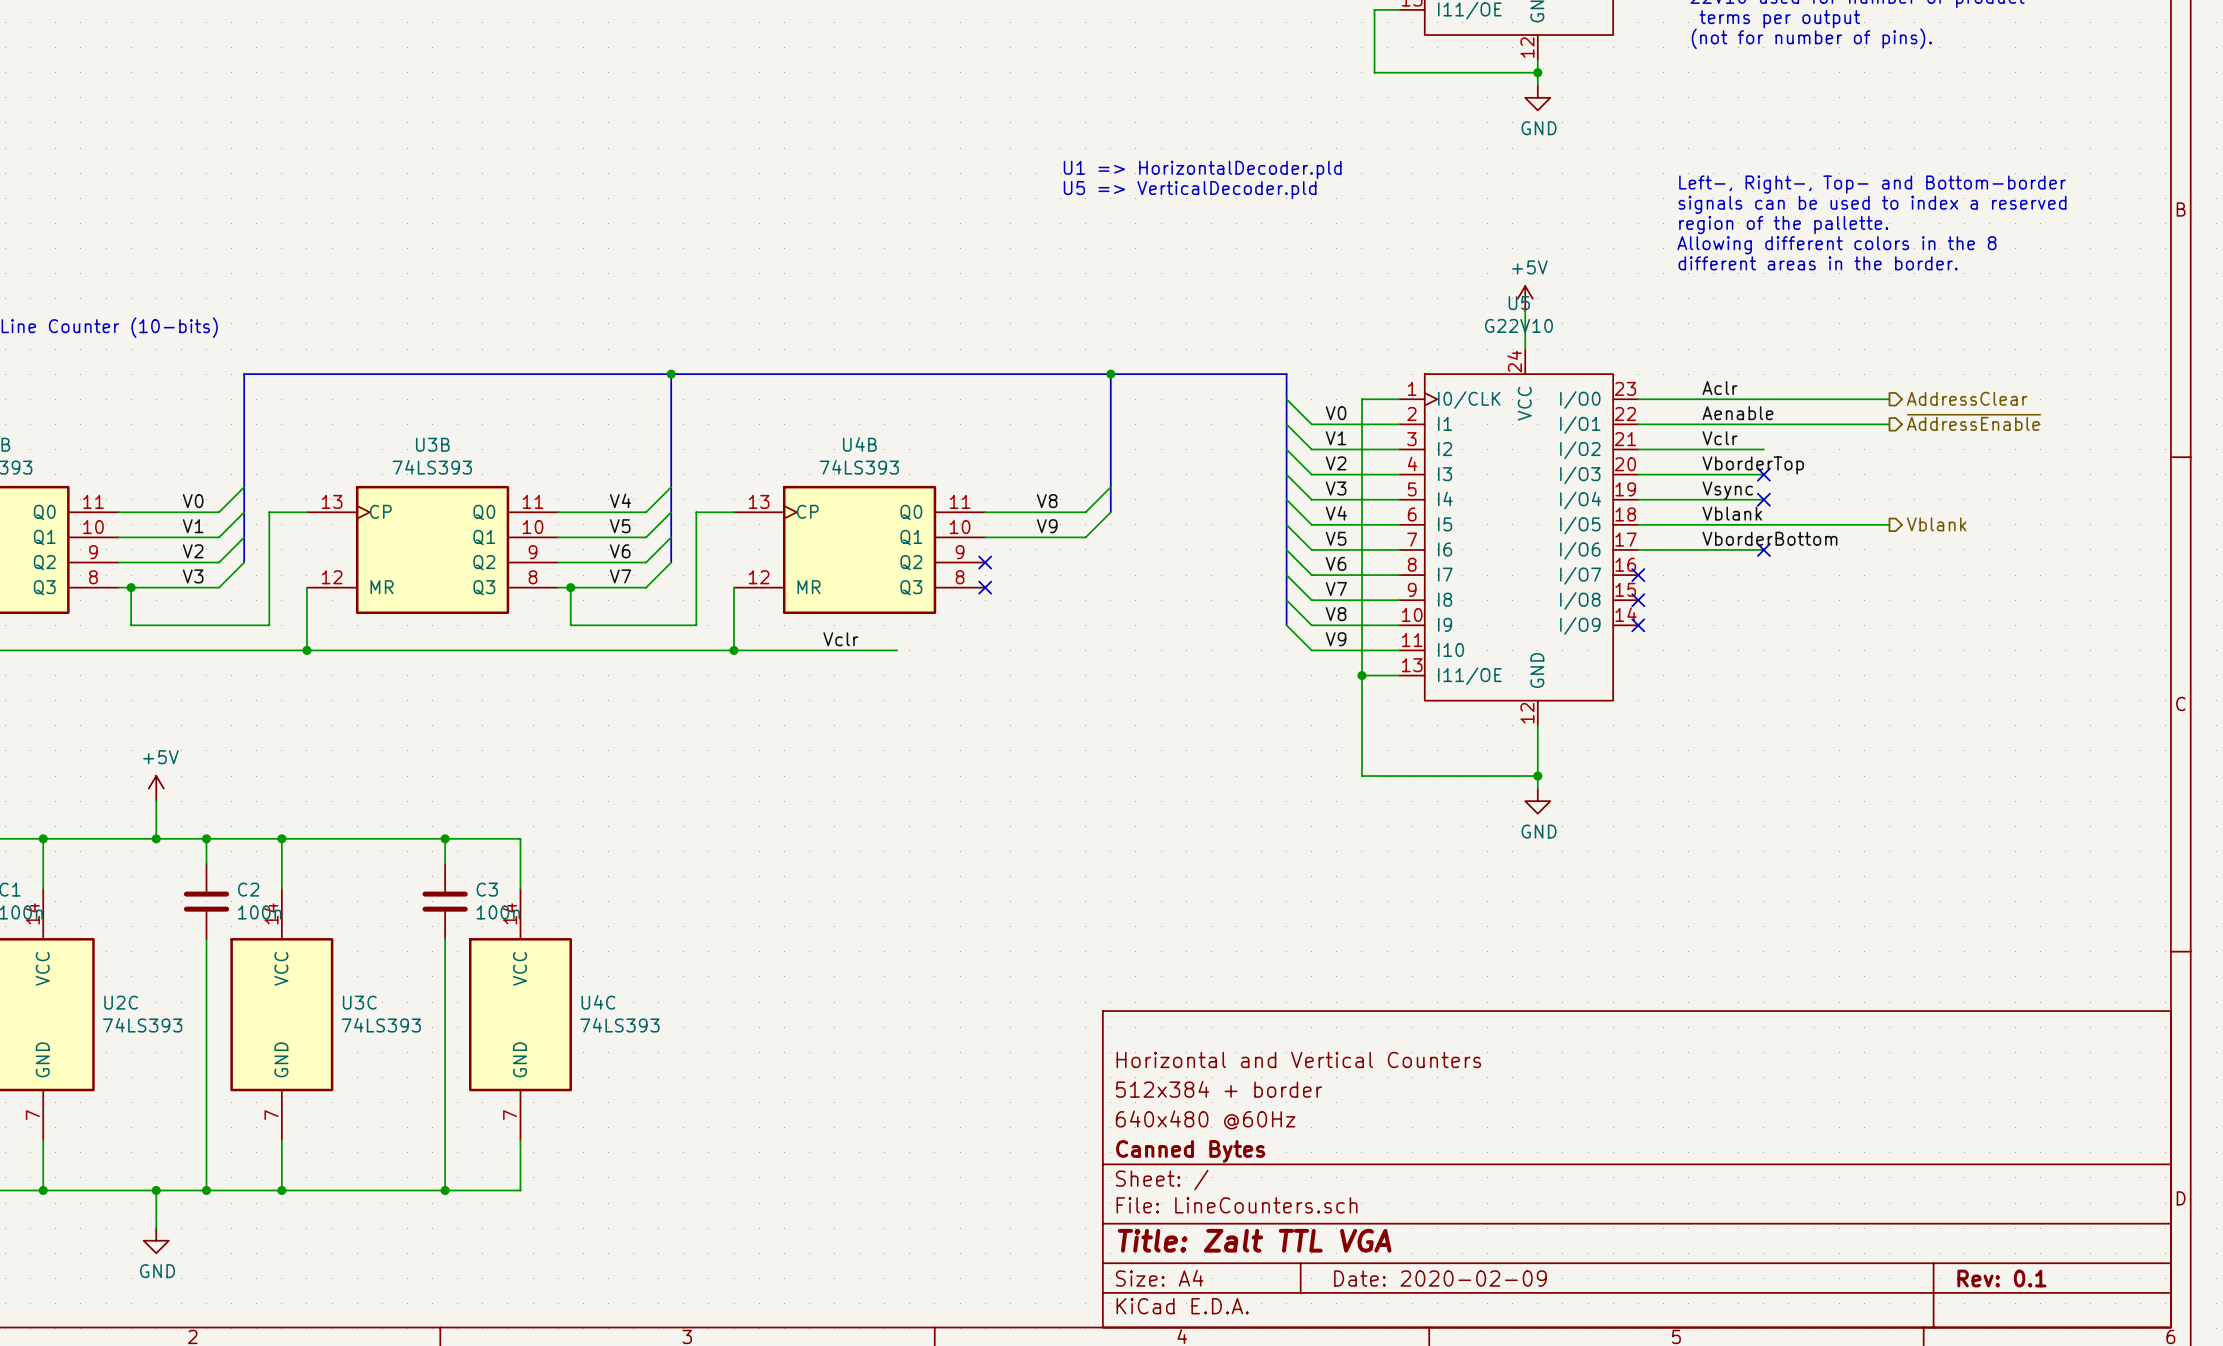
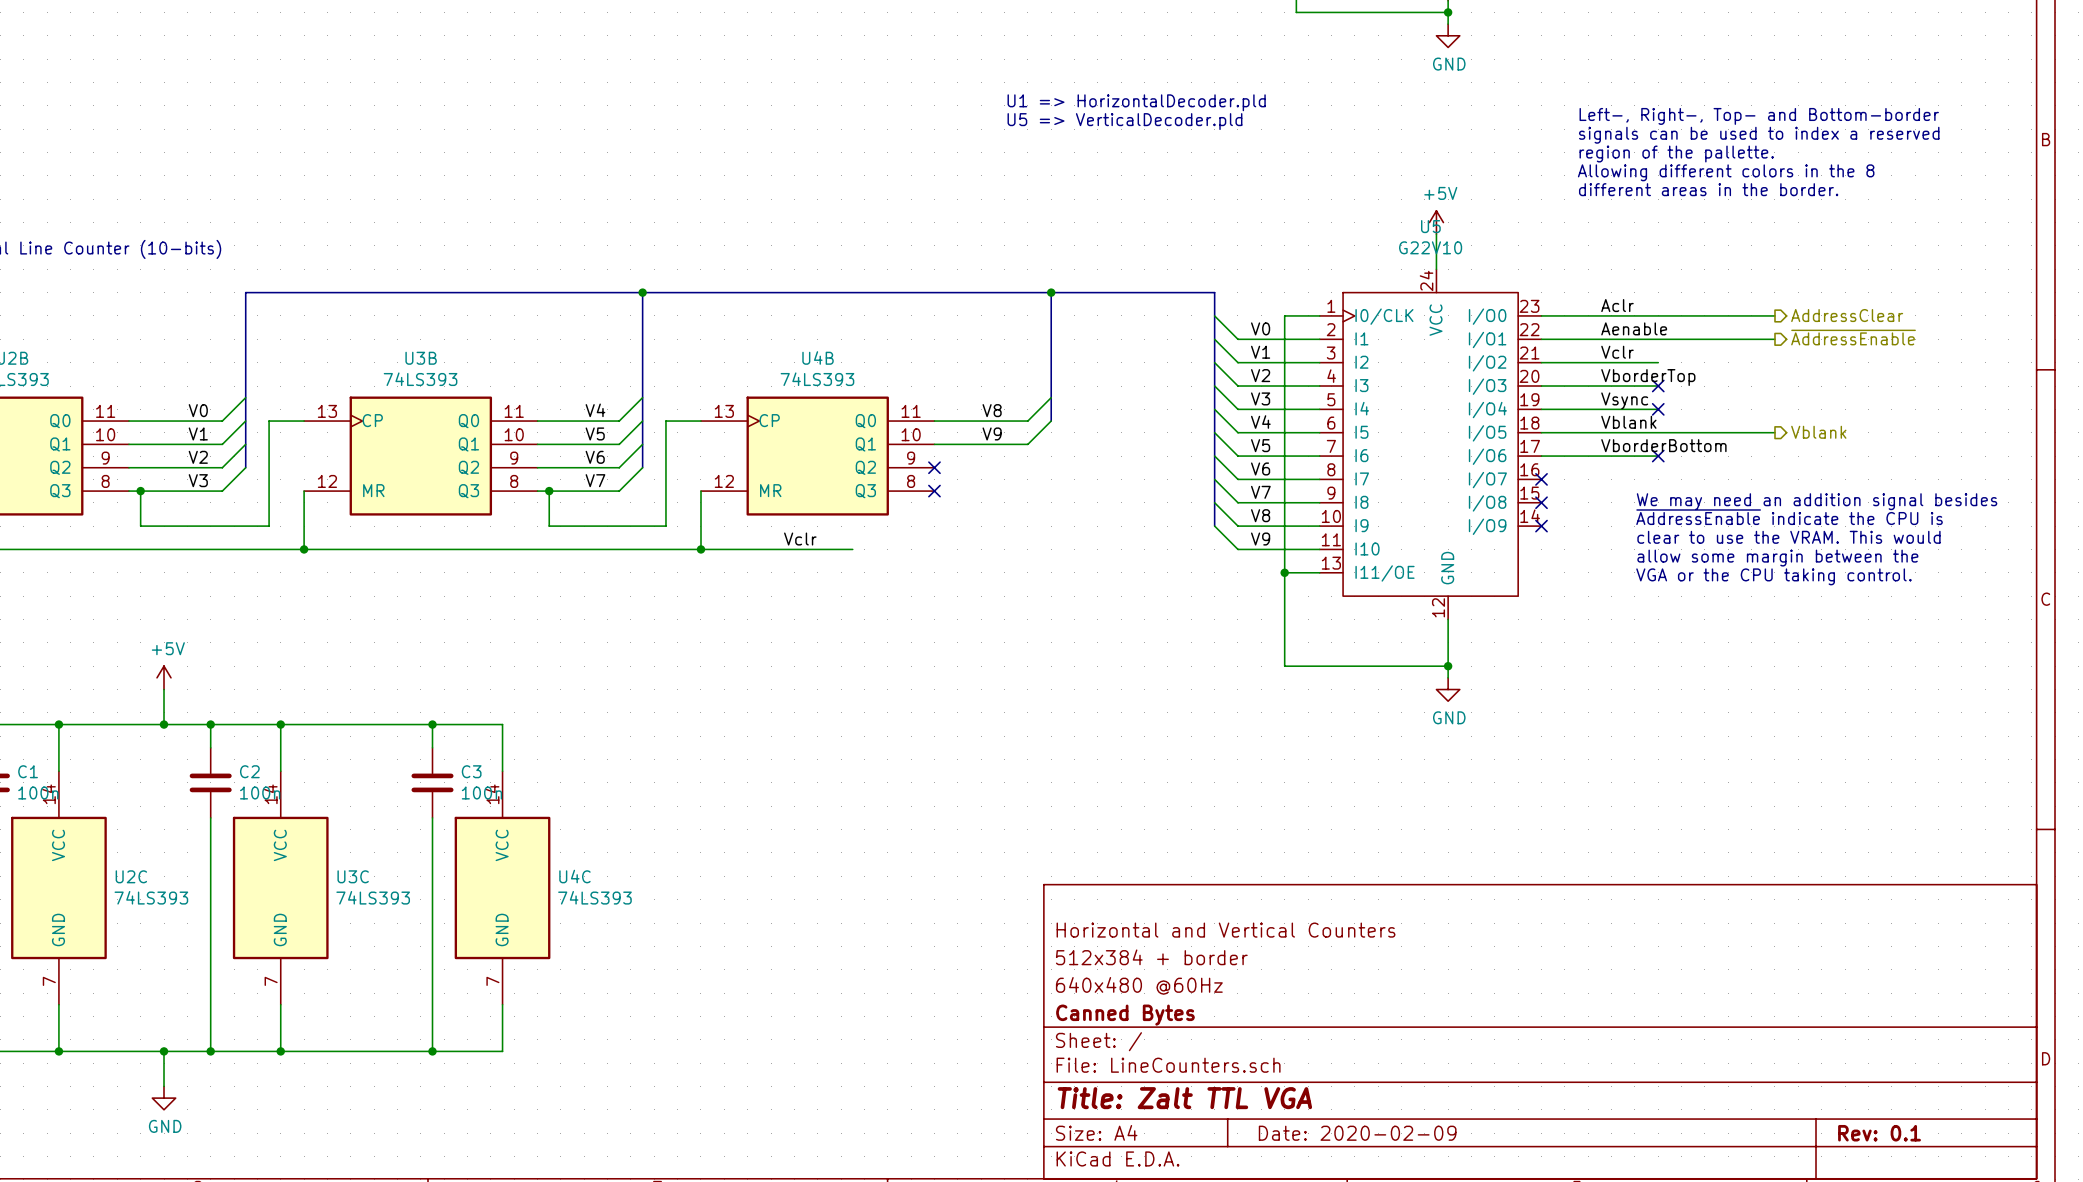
text: none -> We may need an addition signal besides (1817, 501)
text: none -> ~{AddressEnable} indicate the CPU is (1789, 517)
text: none -> clear to use the VRAM. This would (1788, 537)
text: none -> allow some margin between the (1777, 558)
text: none -> VGA or the CPU taking control. (1773, 576)

